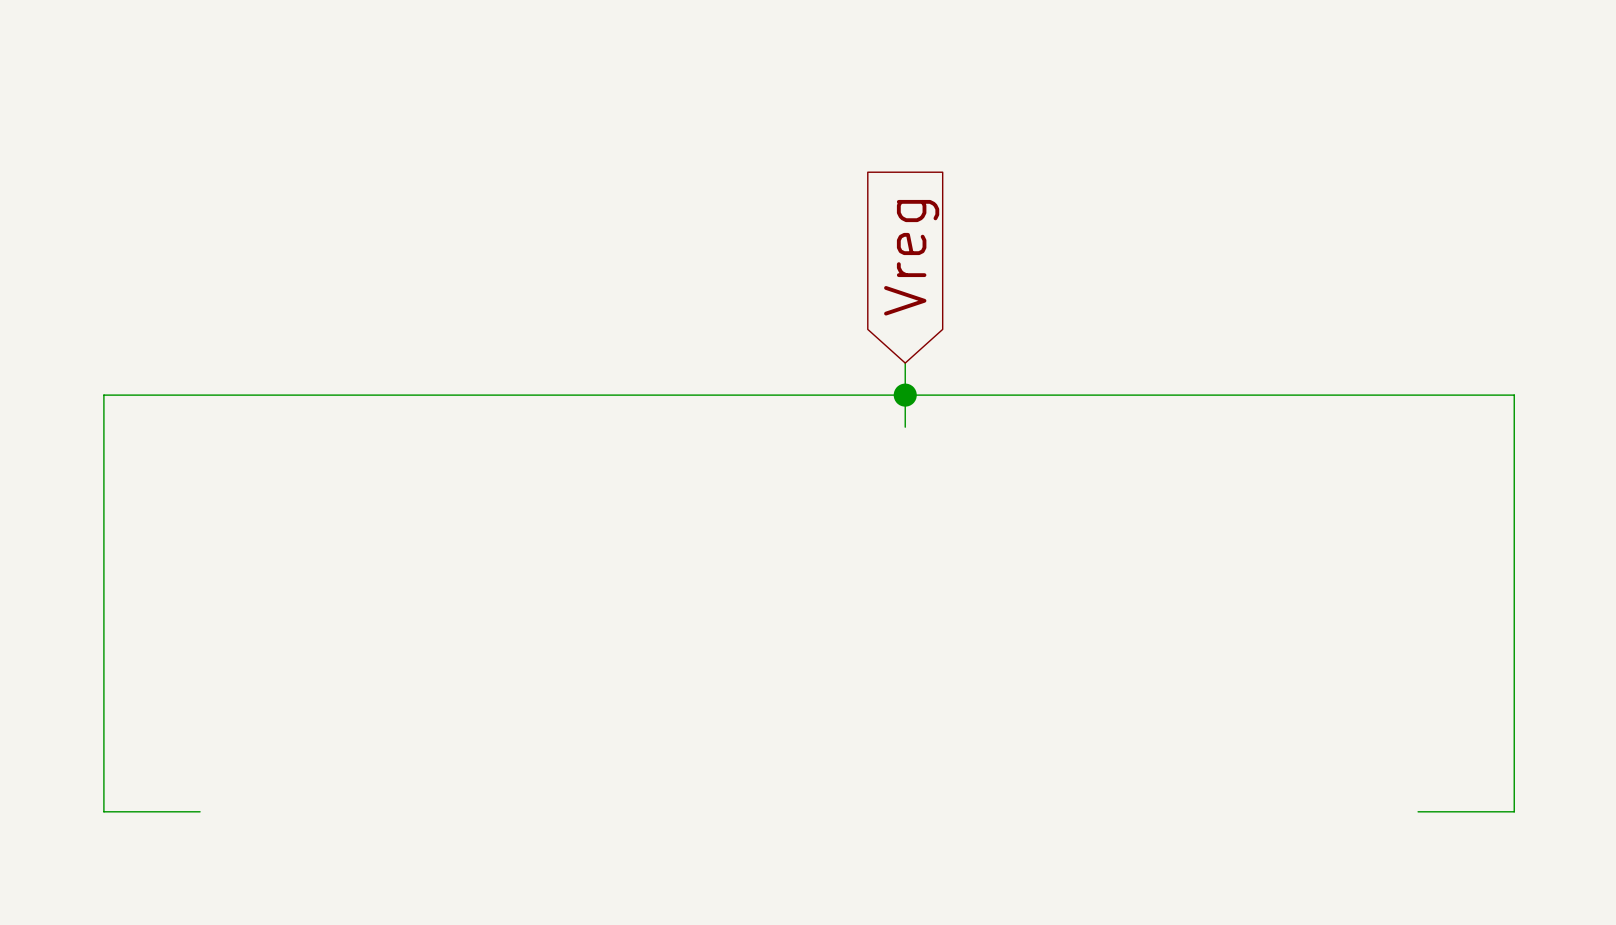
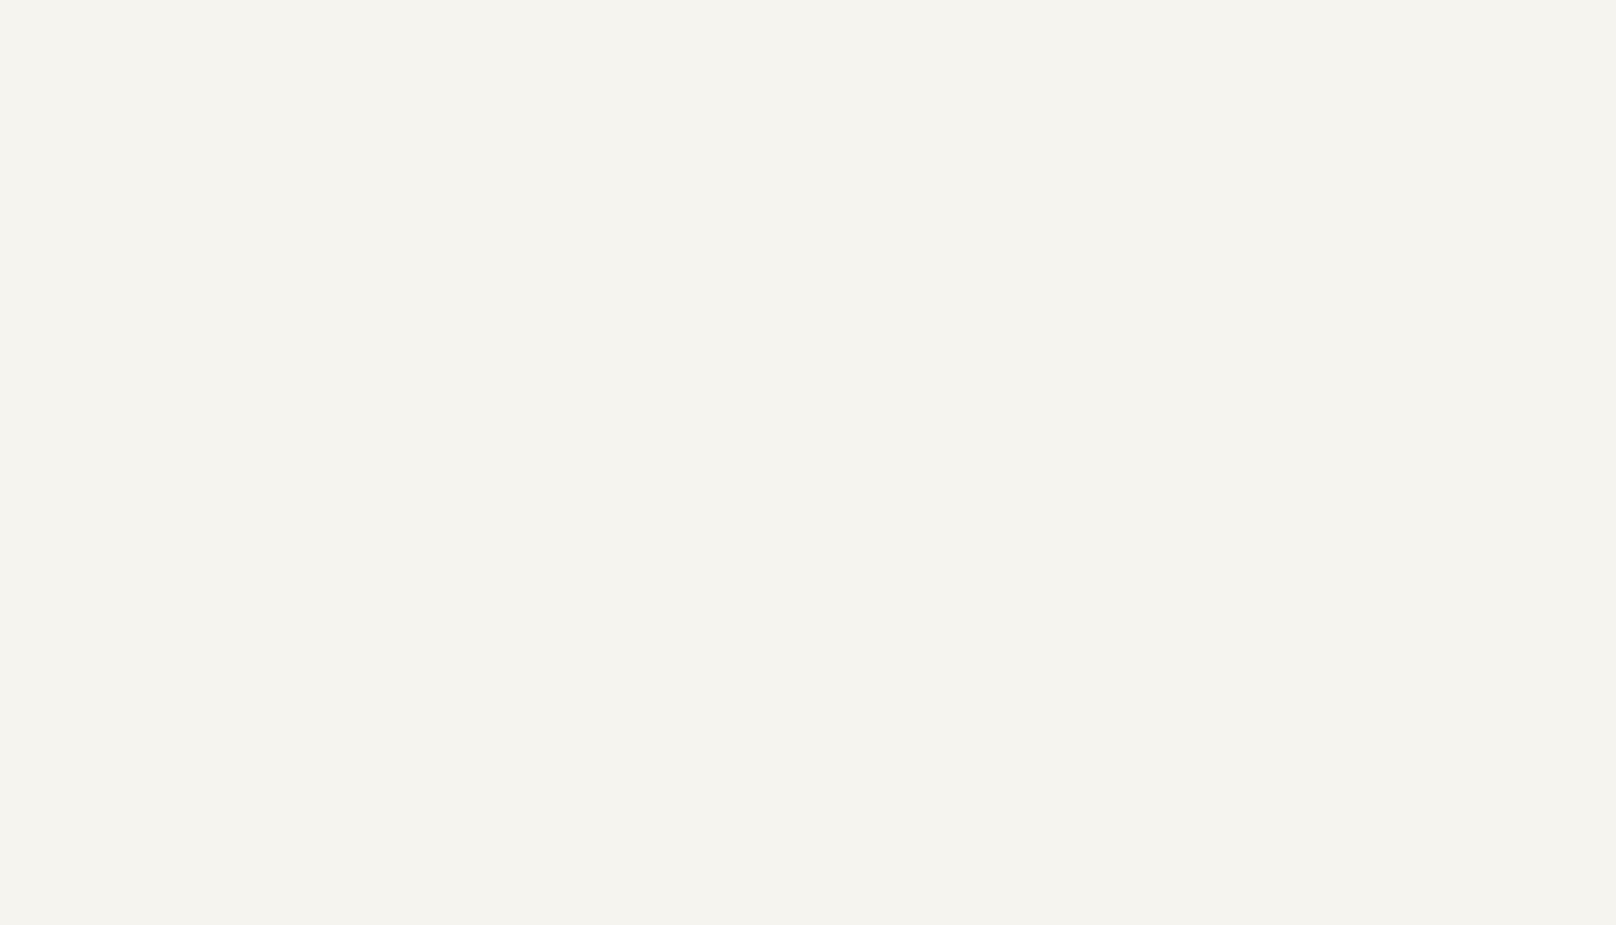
global label: Vreg (911, 257) -> none
wire: (905, 363) (905, 427) -> none
junction: (905, 395) -> none
wire: (200, 811) (103, 811) (103, 395) (1514, 395) (1514, 811) (1418, 811) -> none

